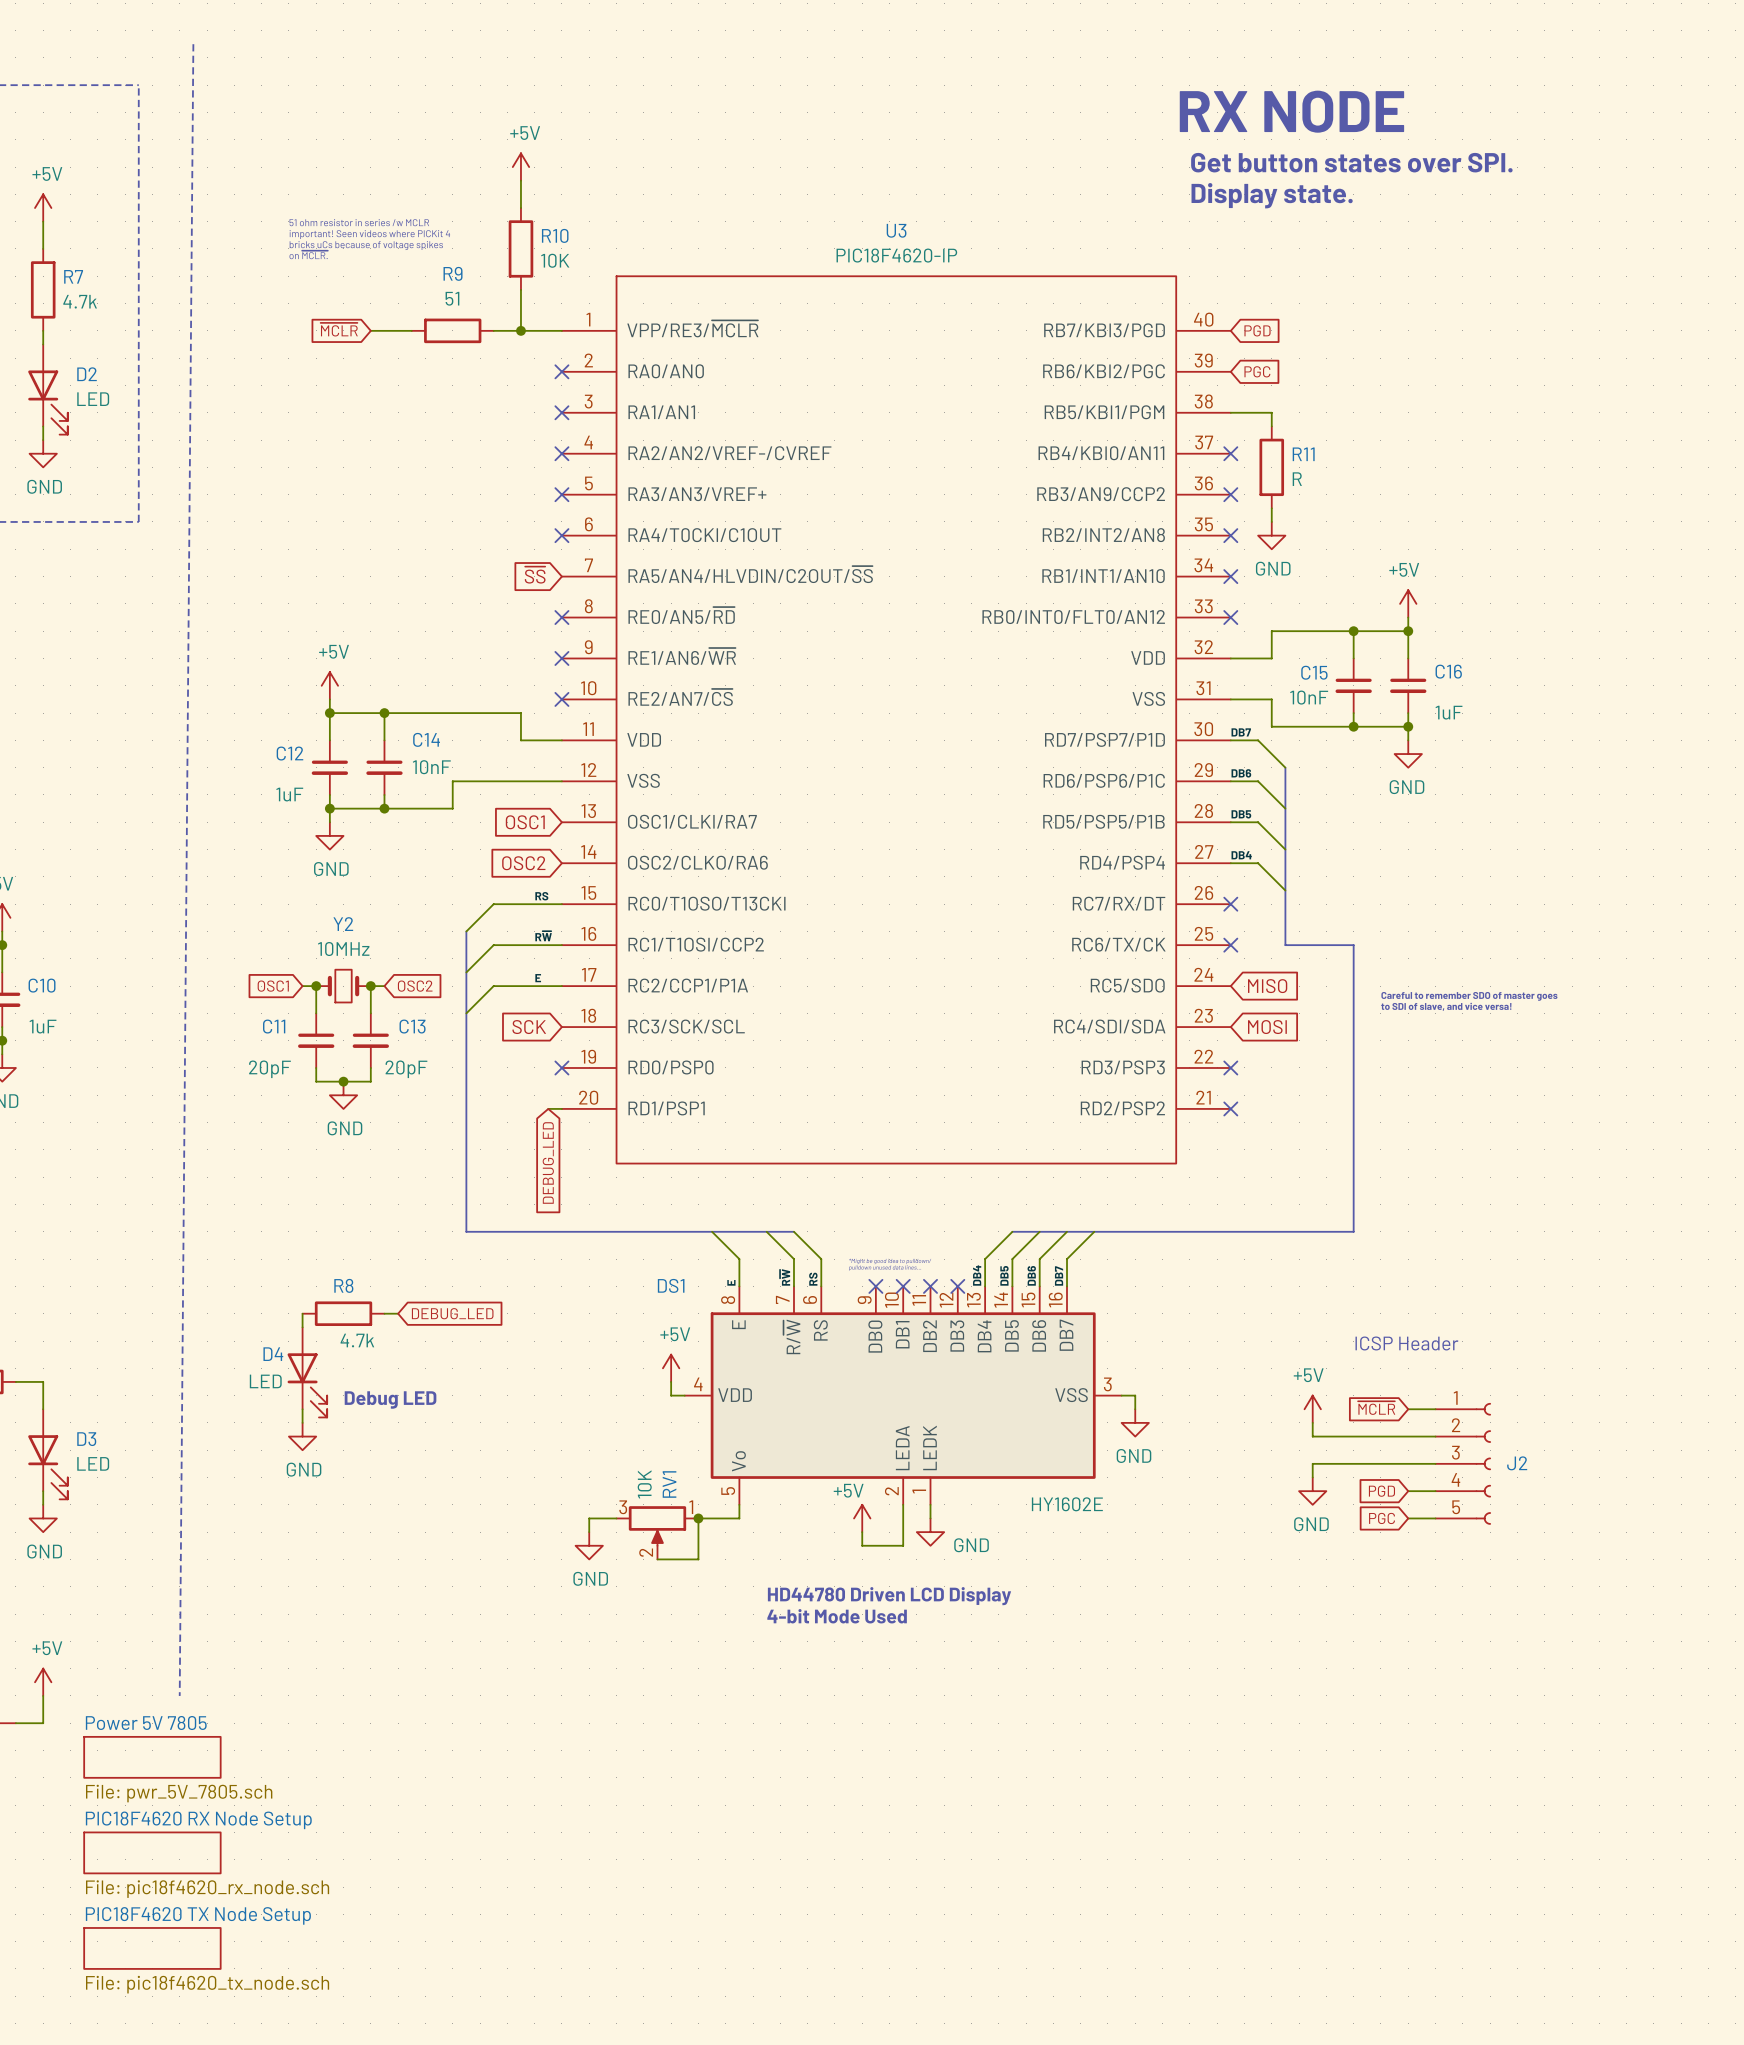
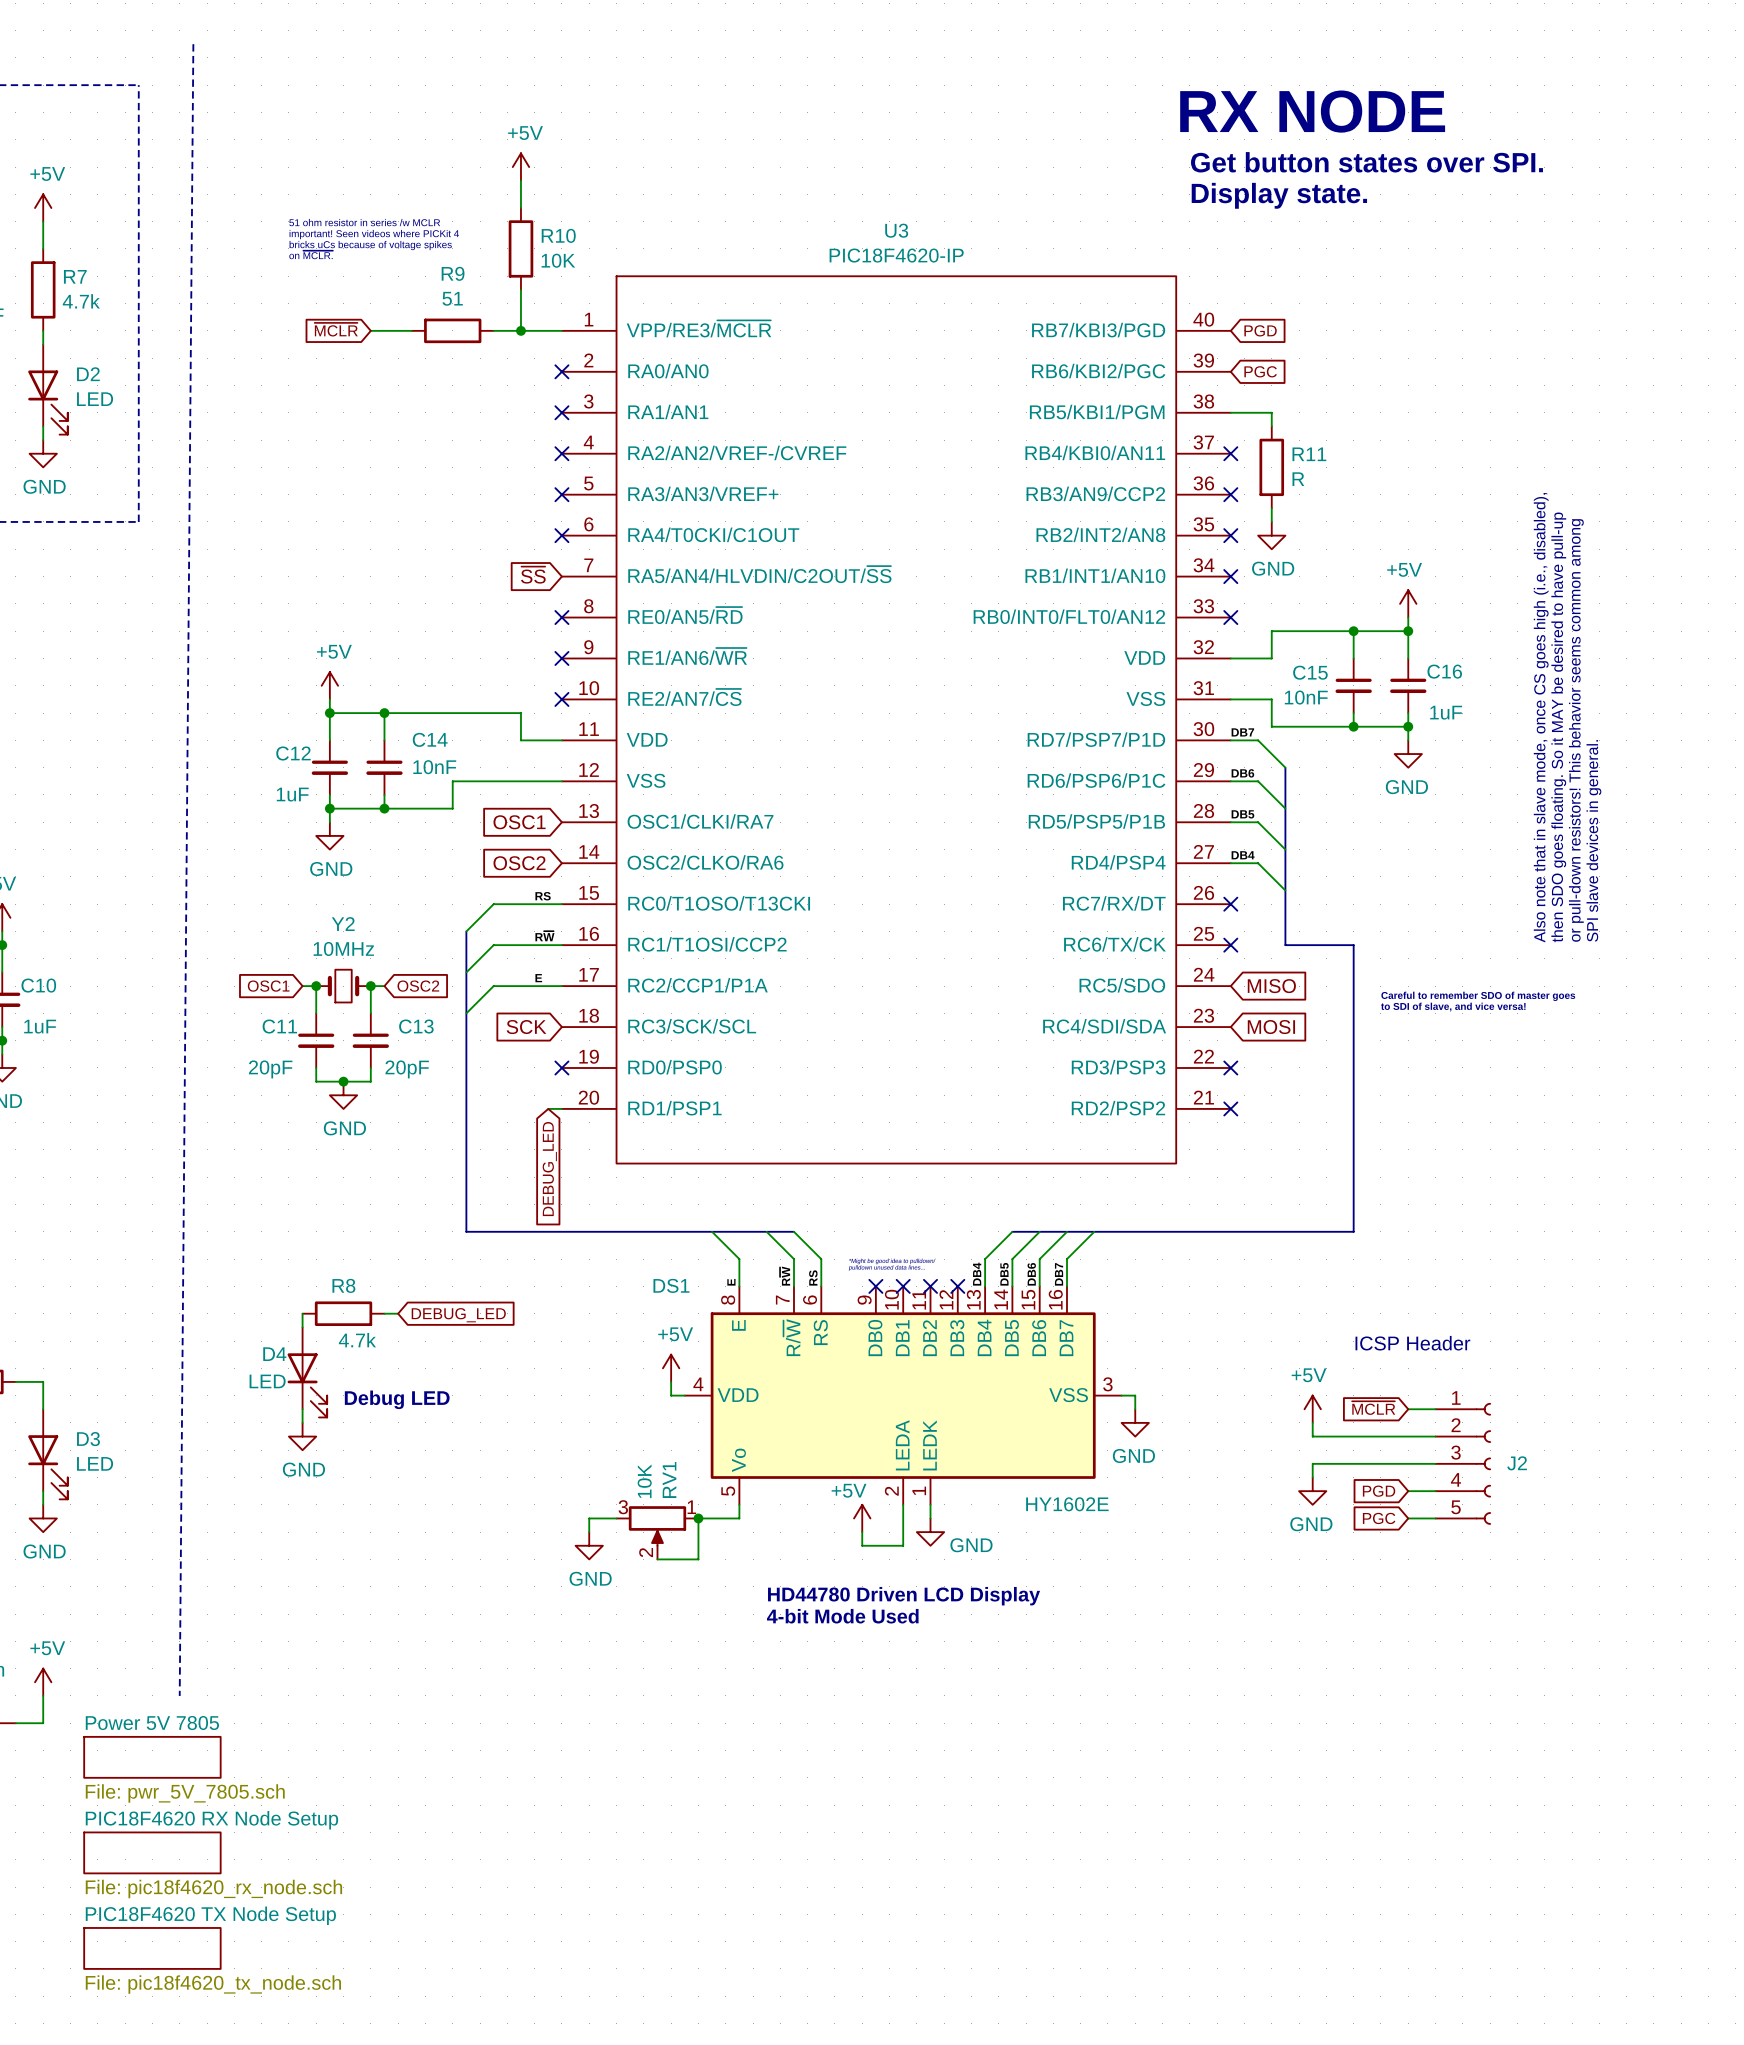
text: none -> Also note that in slave mode, once CS goes high (i.e., disabled), (1541, 717)
text: none -> or pull-down resistors! This behavior seems common among (1576, 730)
text: none -> then SDO goes floating. So it MAY be desired to have pull-up (1558, 727)
text: none -> SPI slave devices in general. (1593, 840)

